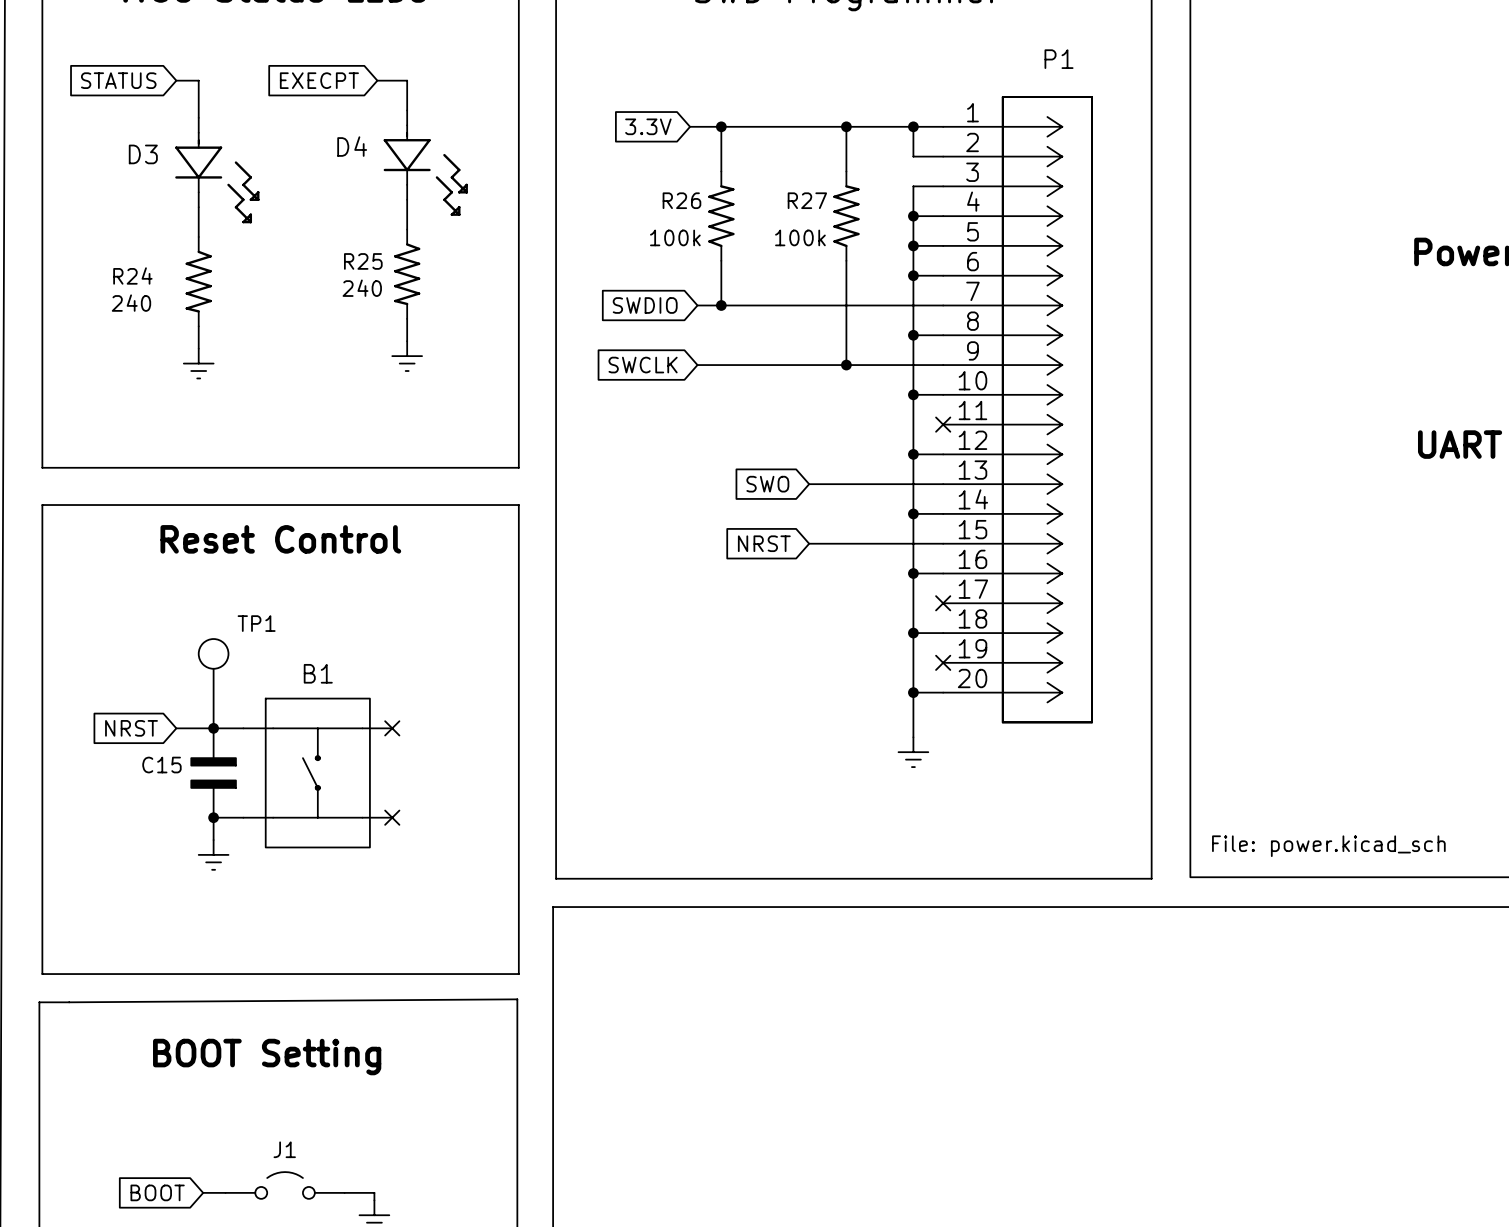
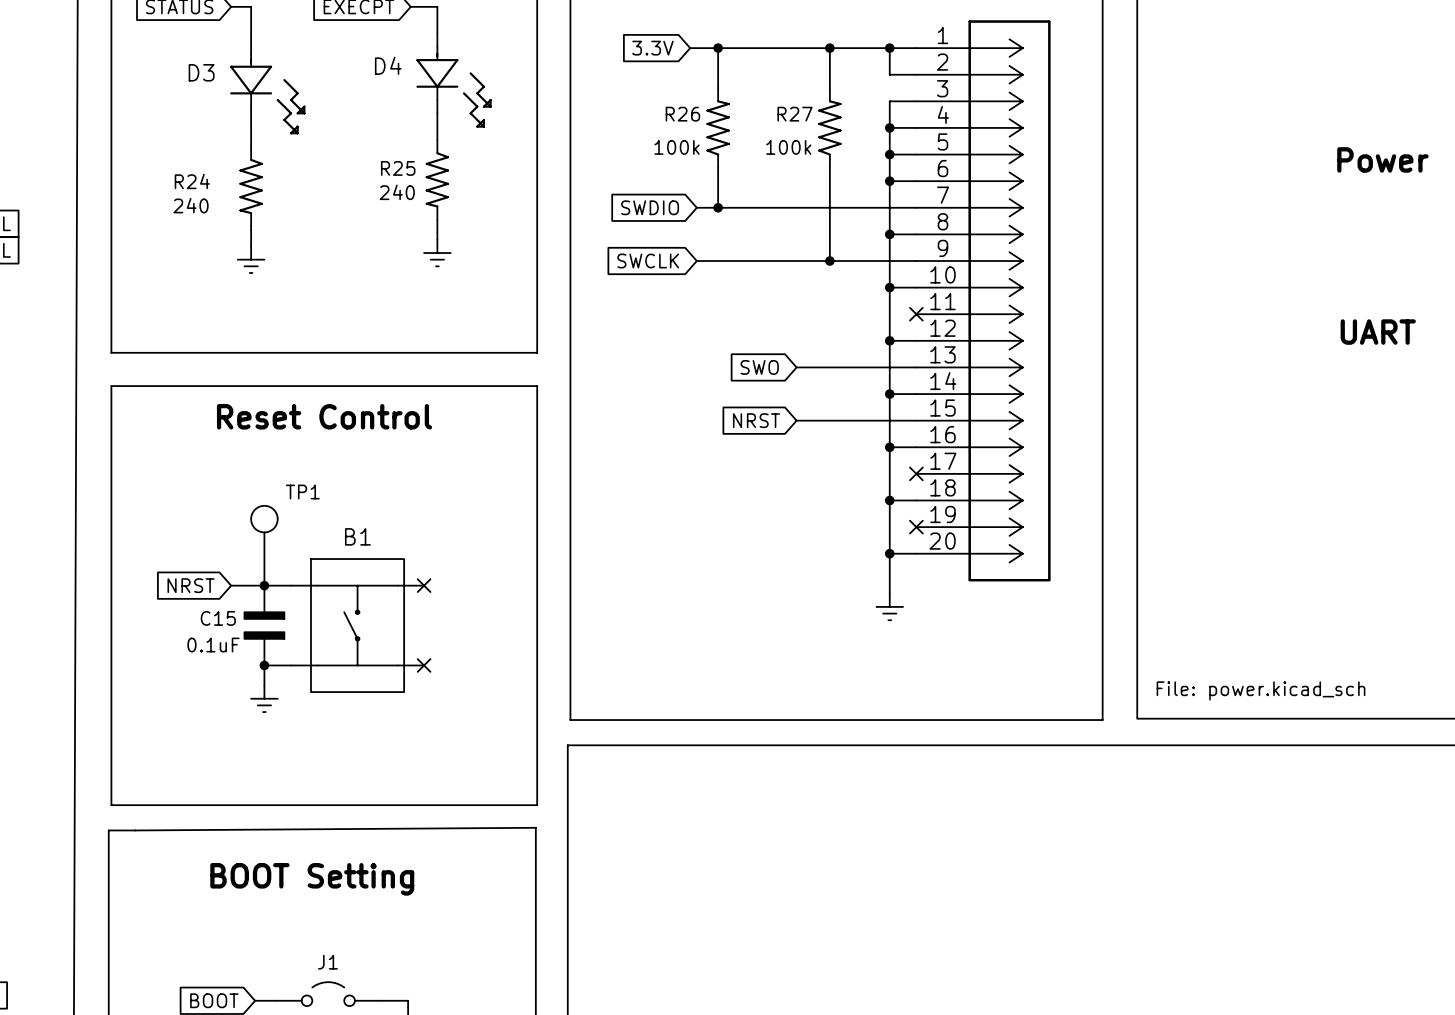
C15 value: none -> 0.1uF (213, 645)

